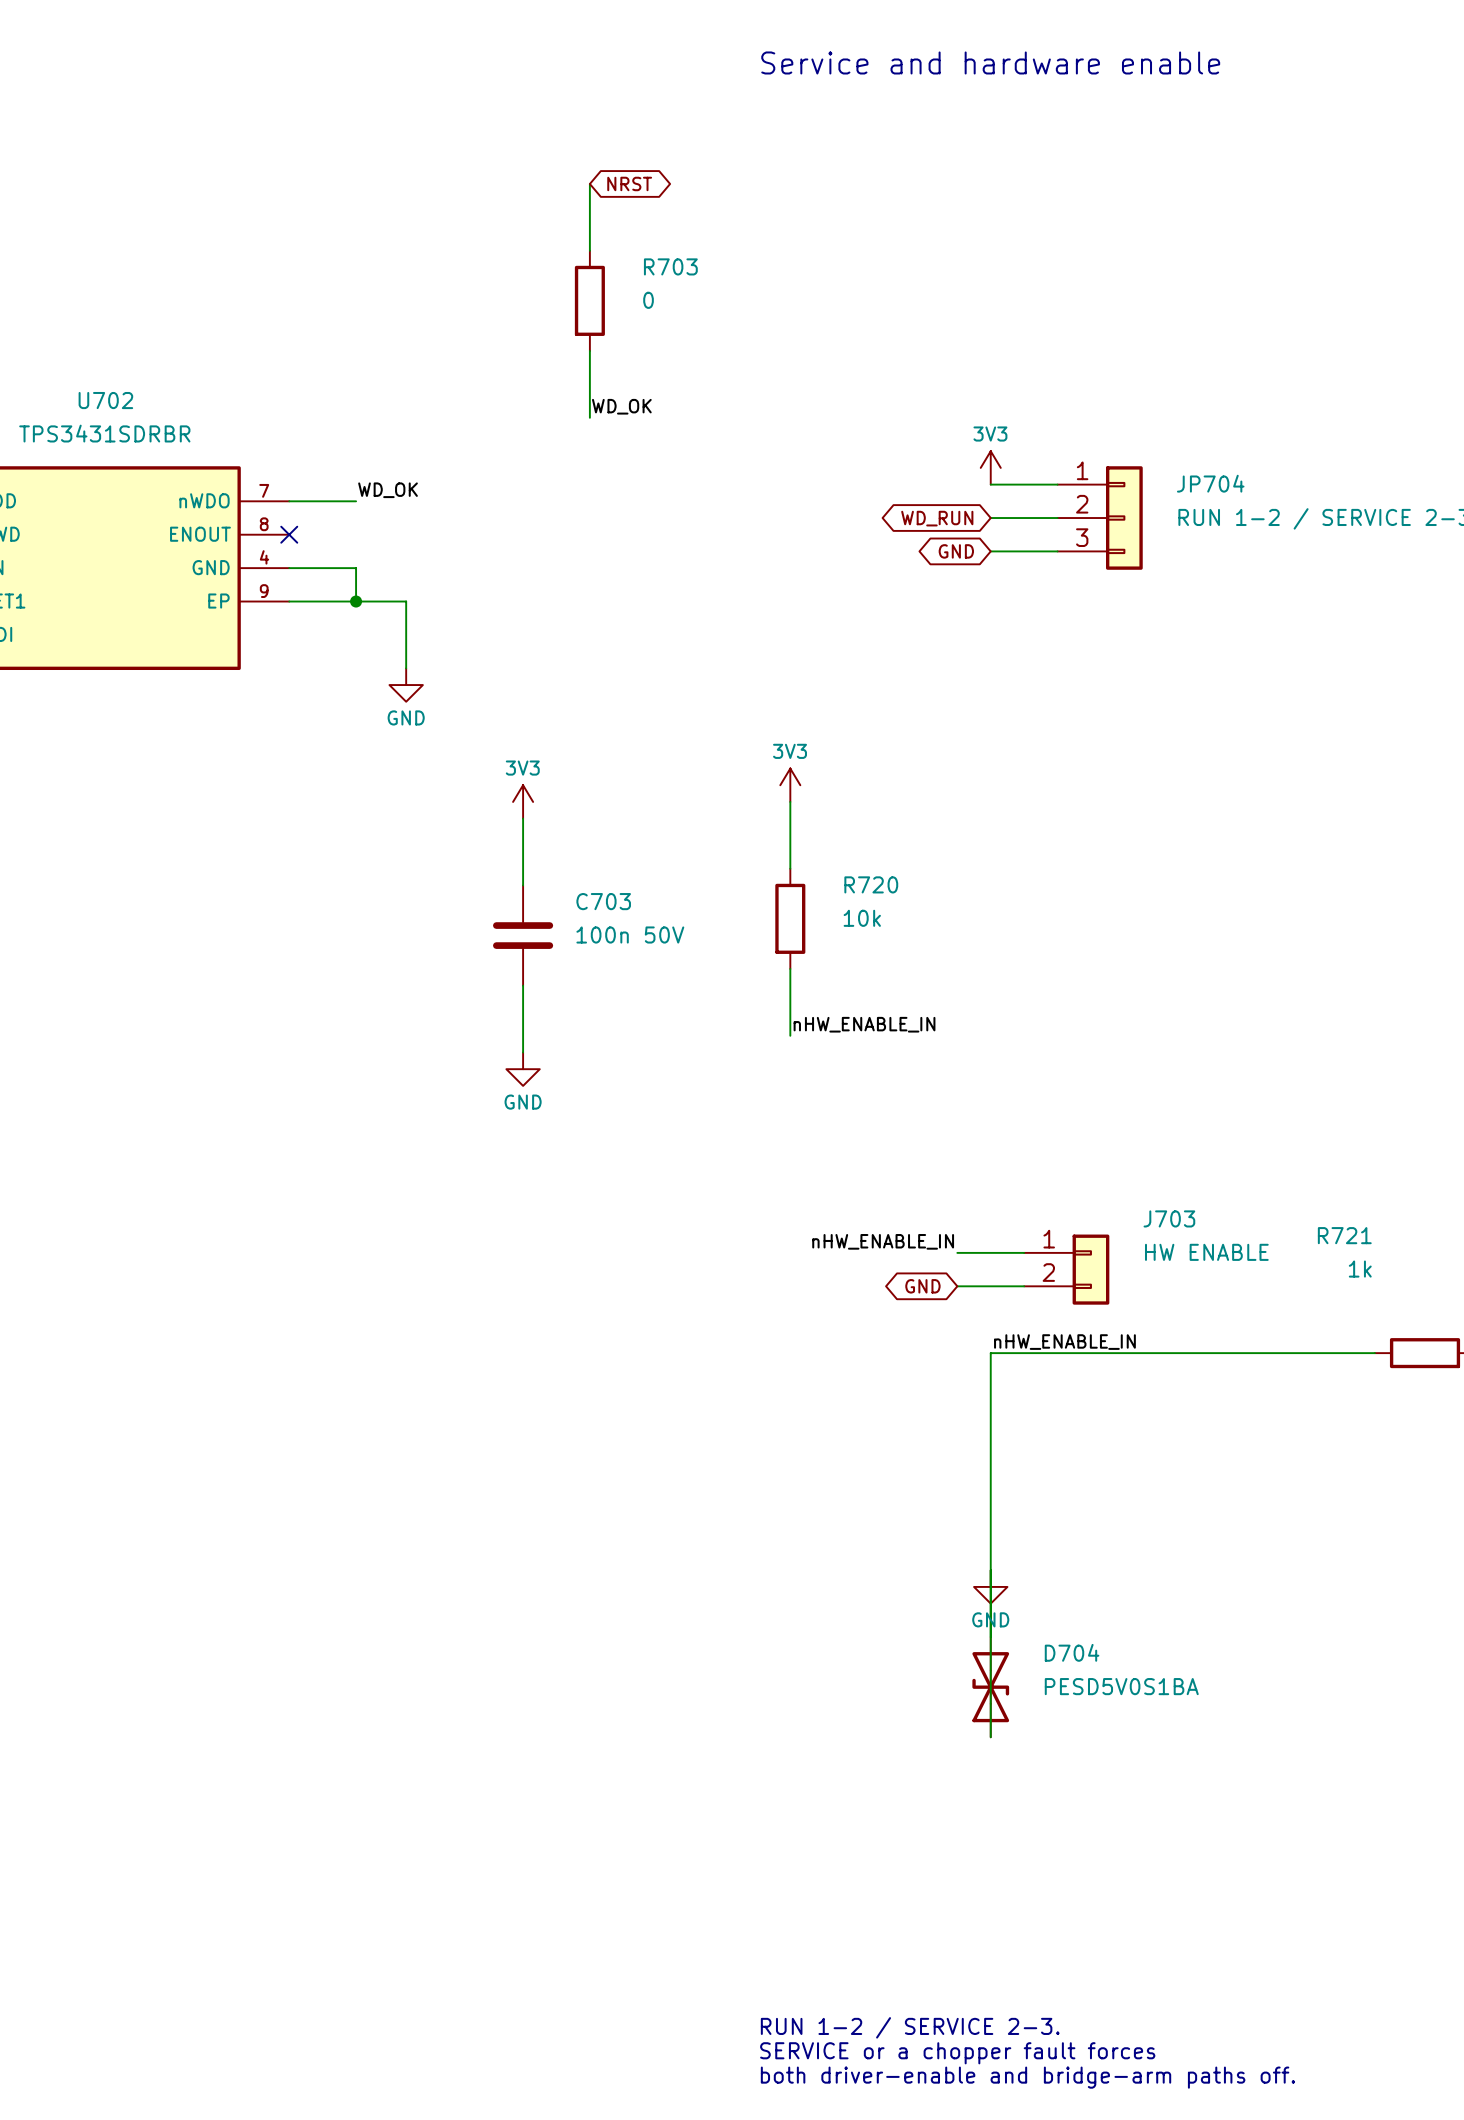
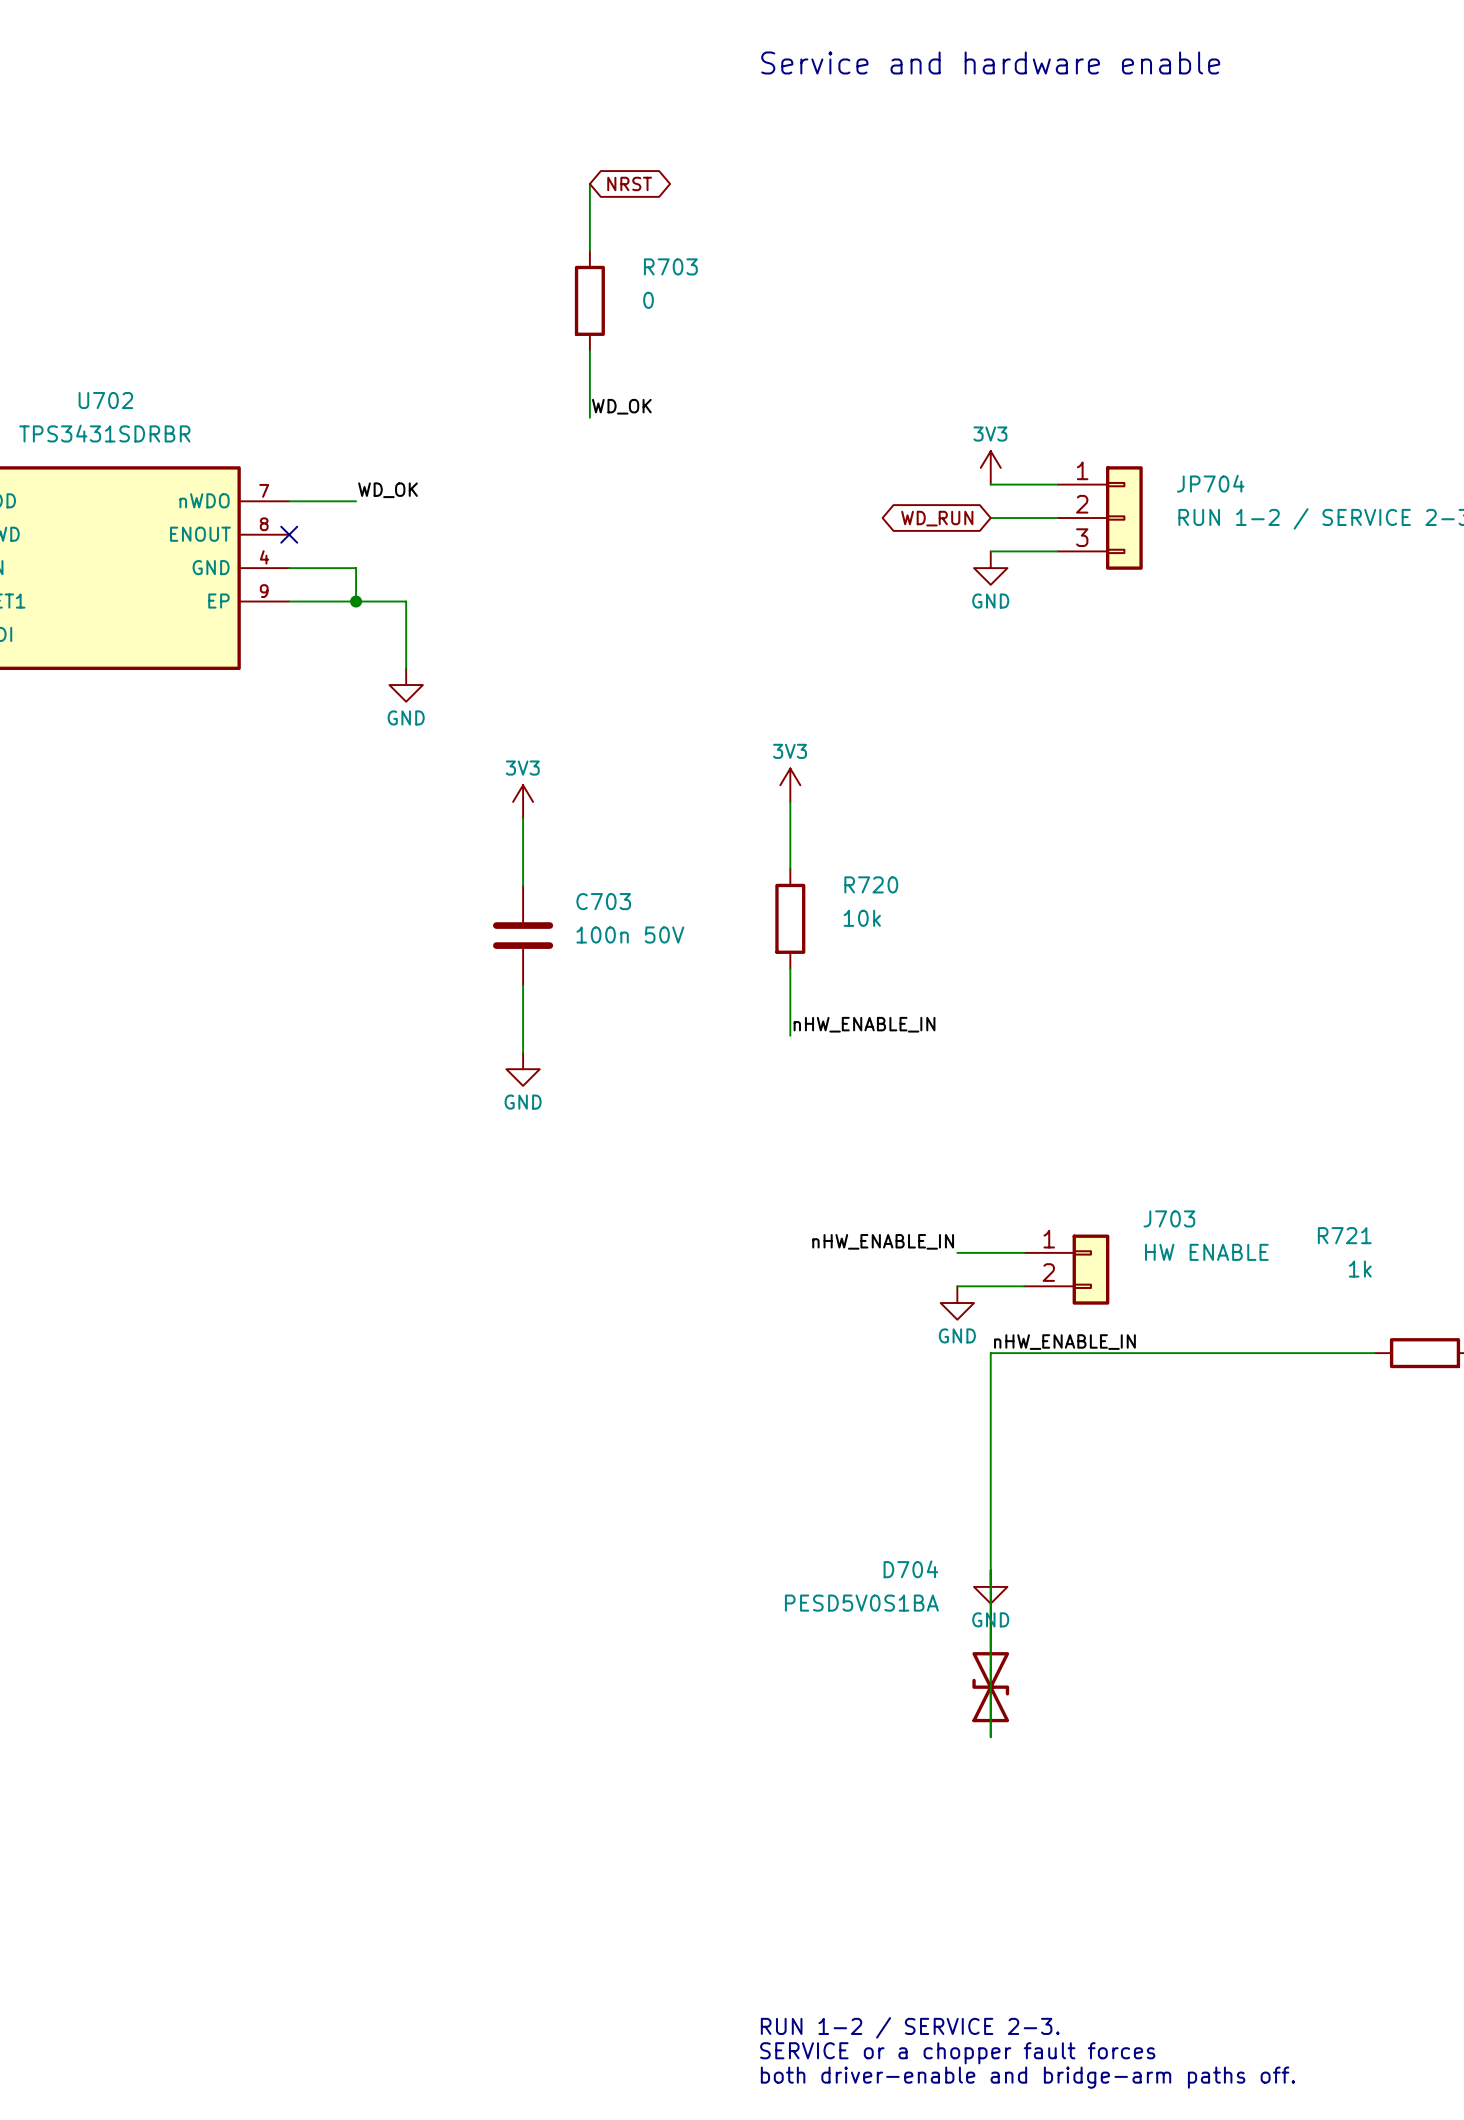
global label: GND (956, 551) -> none
power symbol: none -> GND (990, 568)
global label: GND (922, 1286) -> none
power symbol: none -> GND (957, 1303)
D704 name position: D704 (1072, 1652) -> D704 (910, 1569)
D704 value position: PESD5V0S1BA (1121, 1686) -> PESD5V0S1BA (861, 1603)

